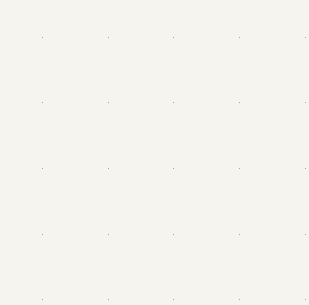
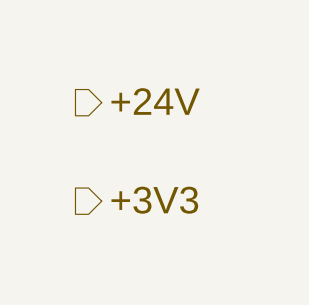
hierarchical label: none -> +24V (155, 101)
hierarchical label: none -> +3V3 (154, 200)

